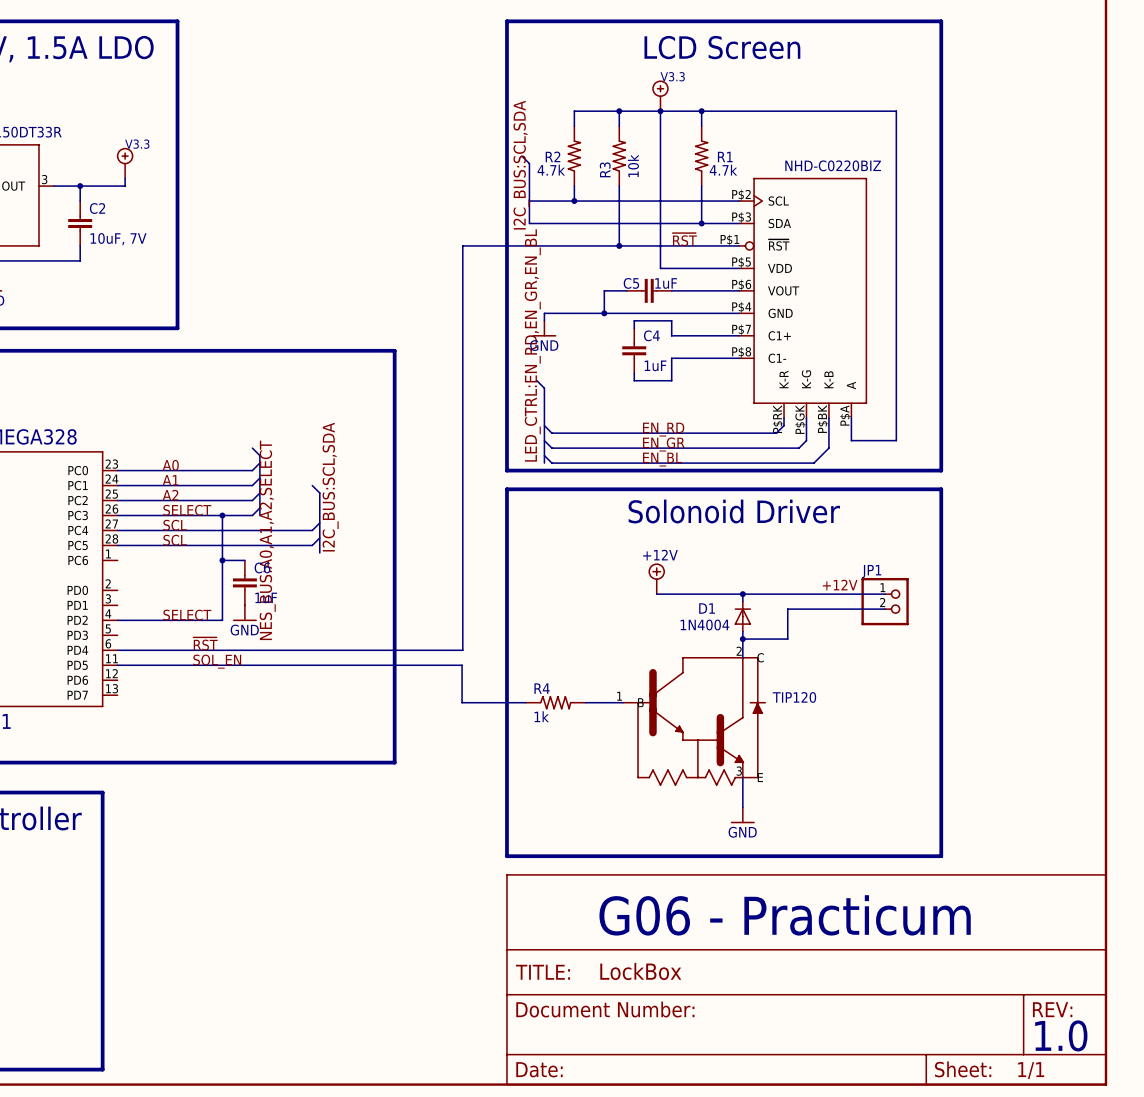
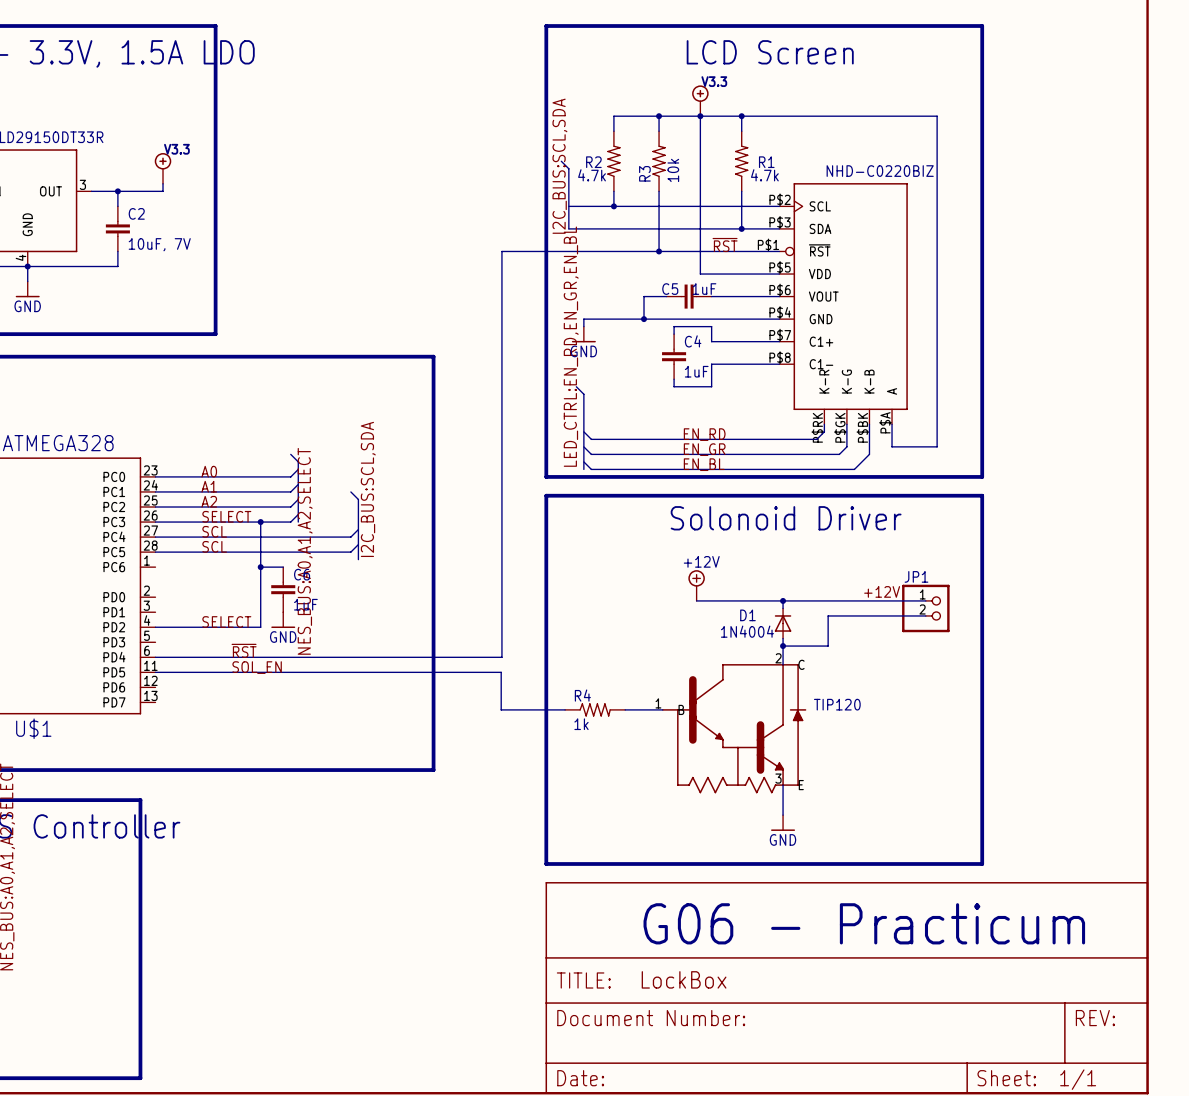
text: 1.0 (1061, 1035) -> none

